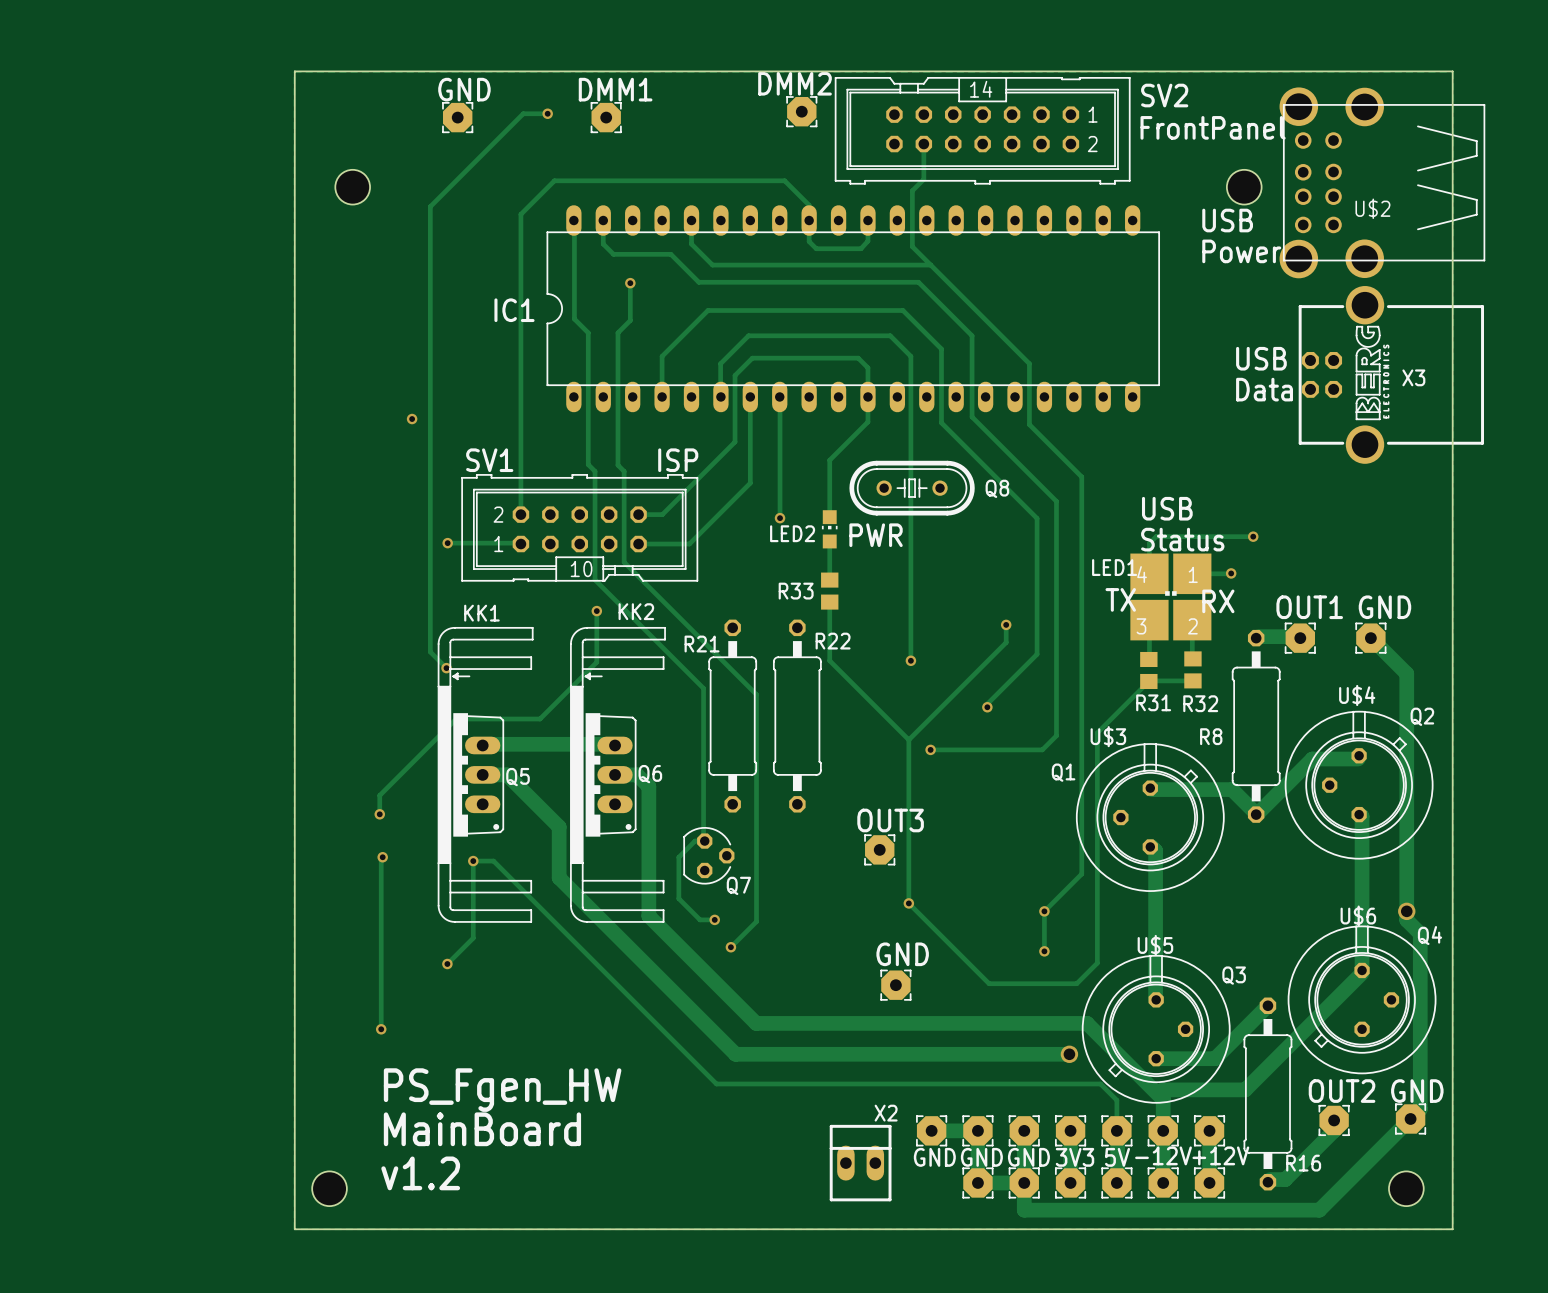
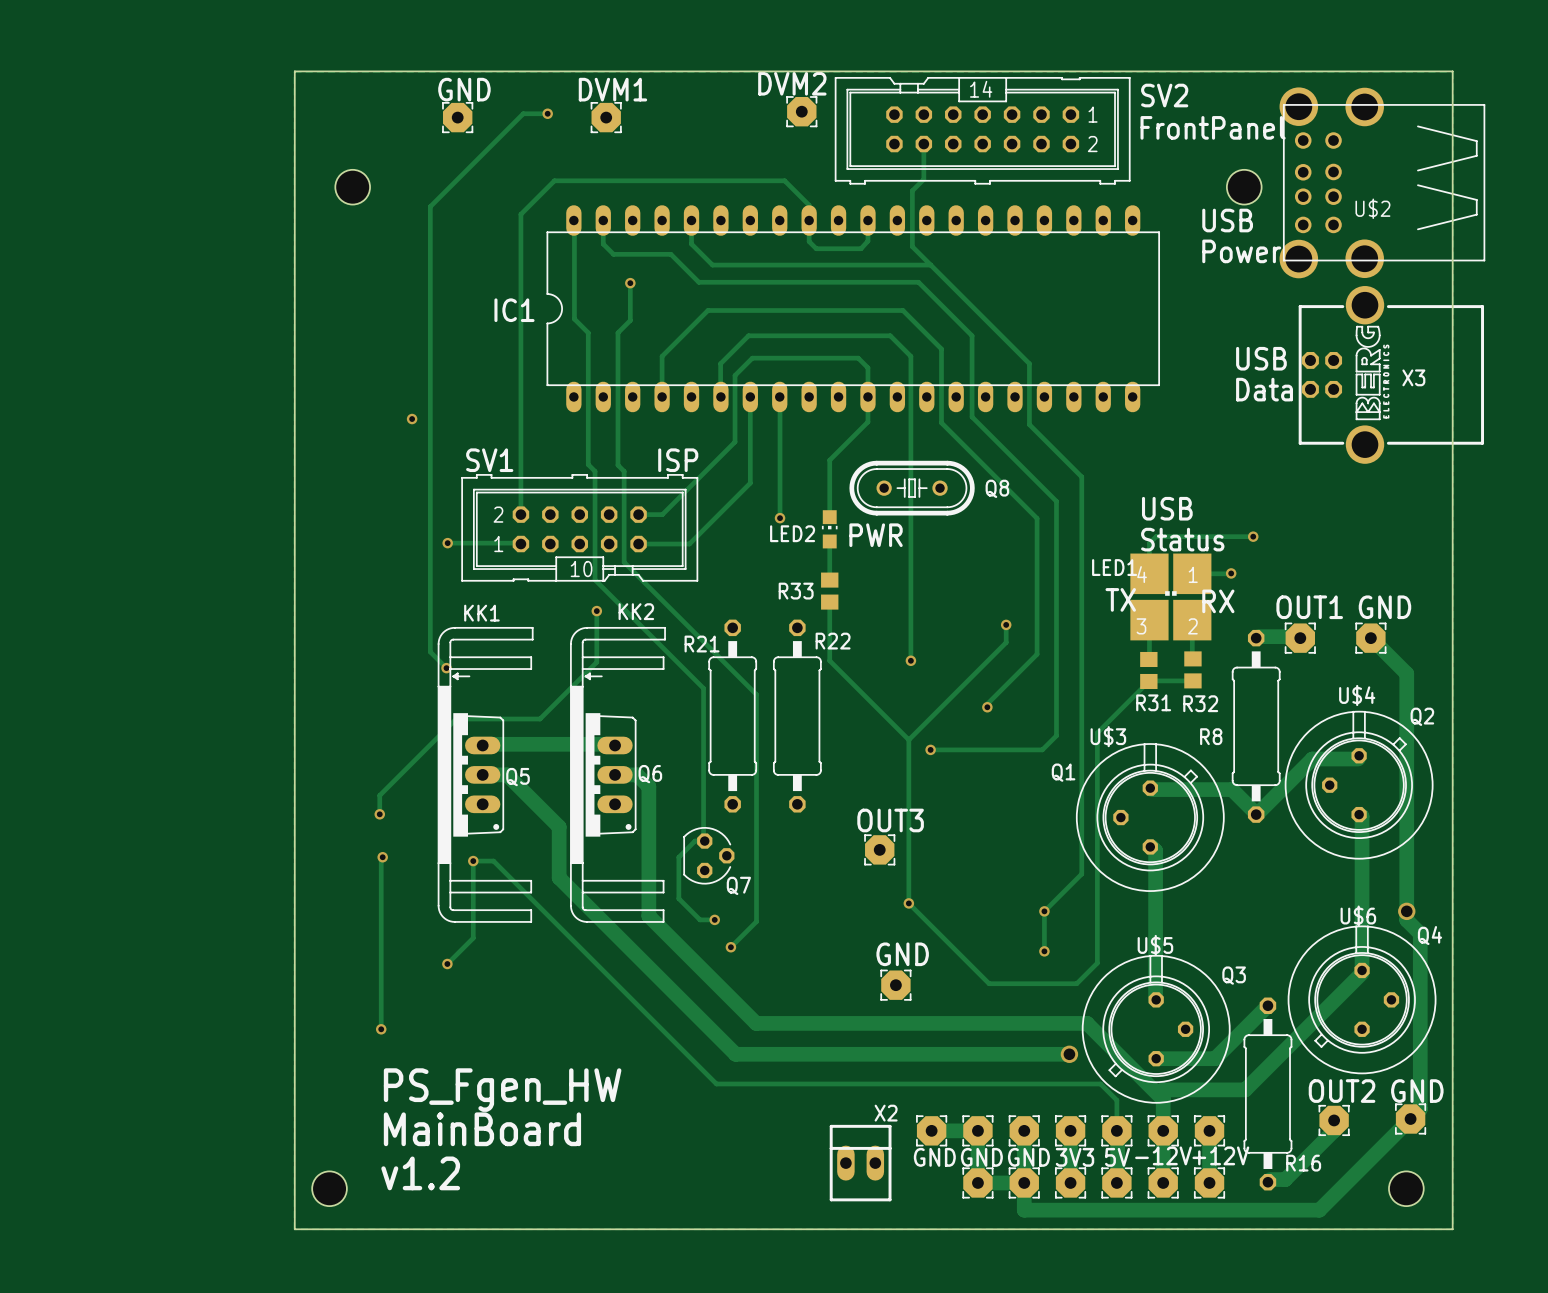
DMM2 name: DMM2 (795, 83) -> DVM2 (792, 83)
DMM1 name: DMM1 (615, 89) -> DVM1 (612, 89)

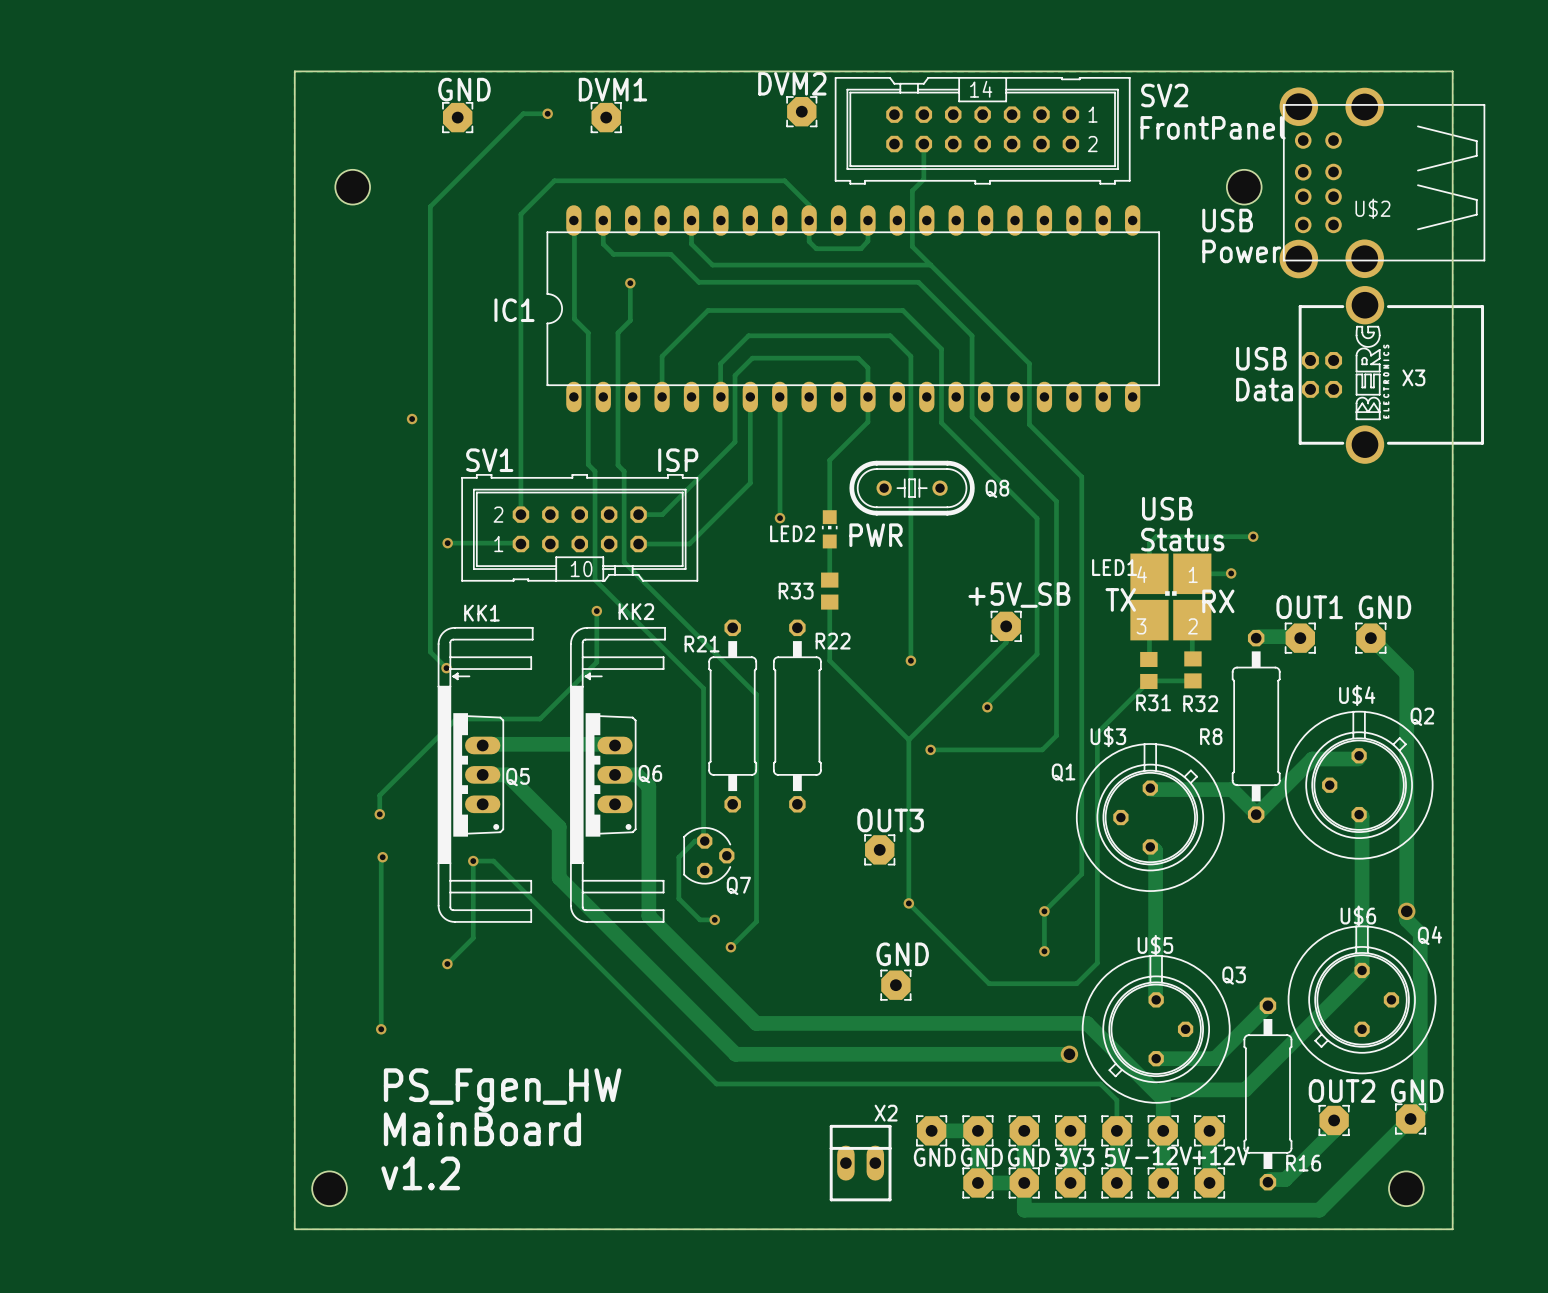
text: none -> +5V_SB (1019, 595)
via: (1006, 624) -> none
part: none -> (1006, 626)

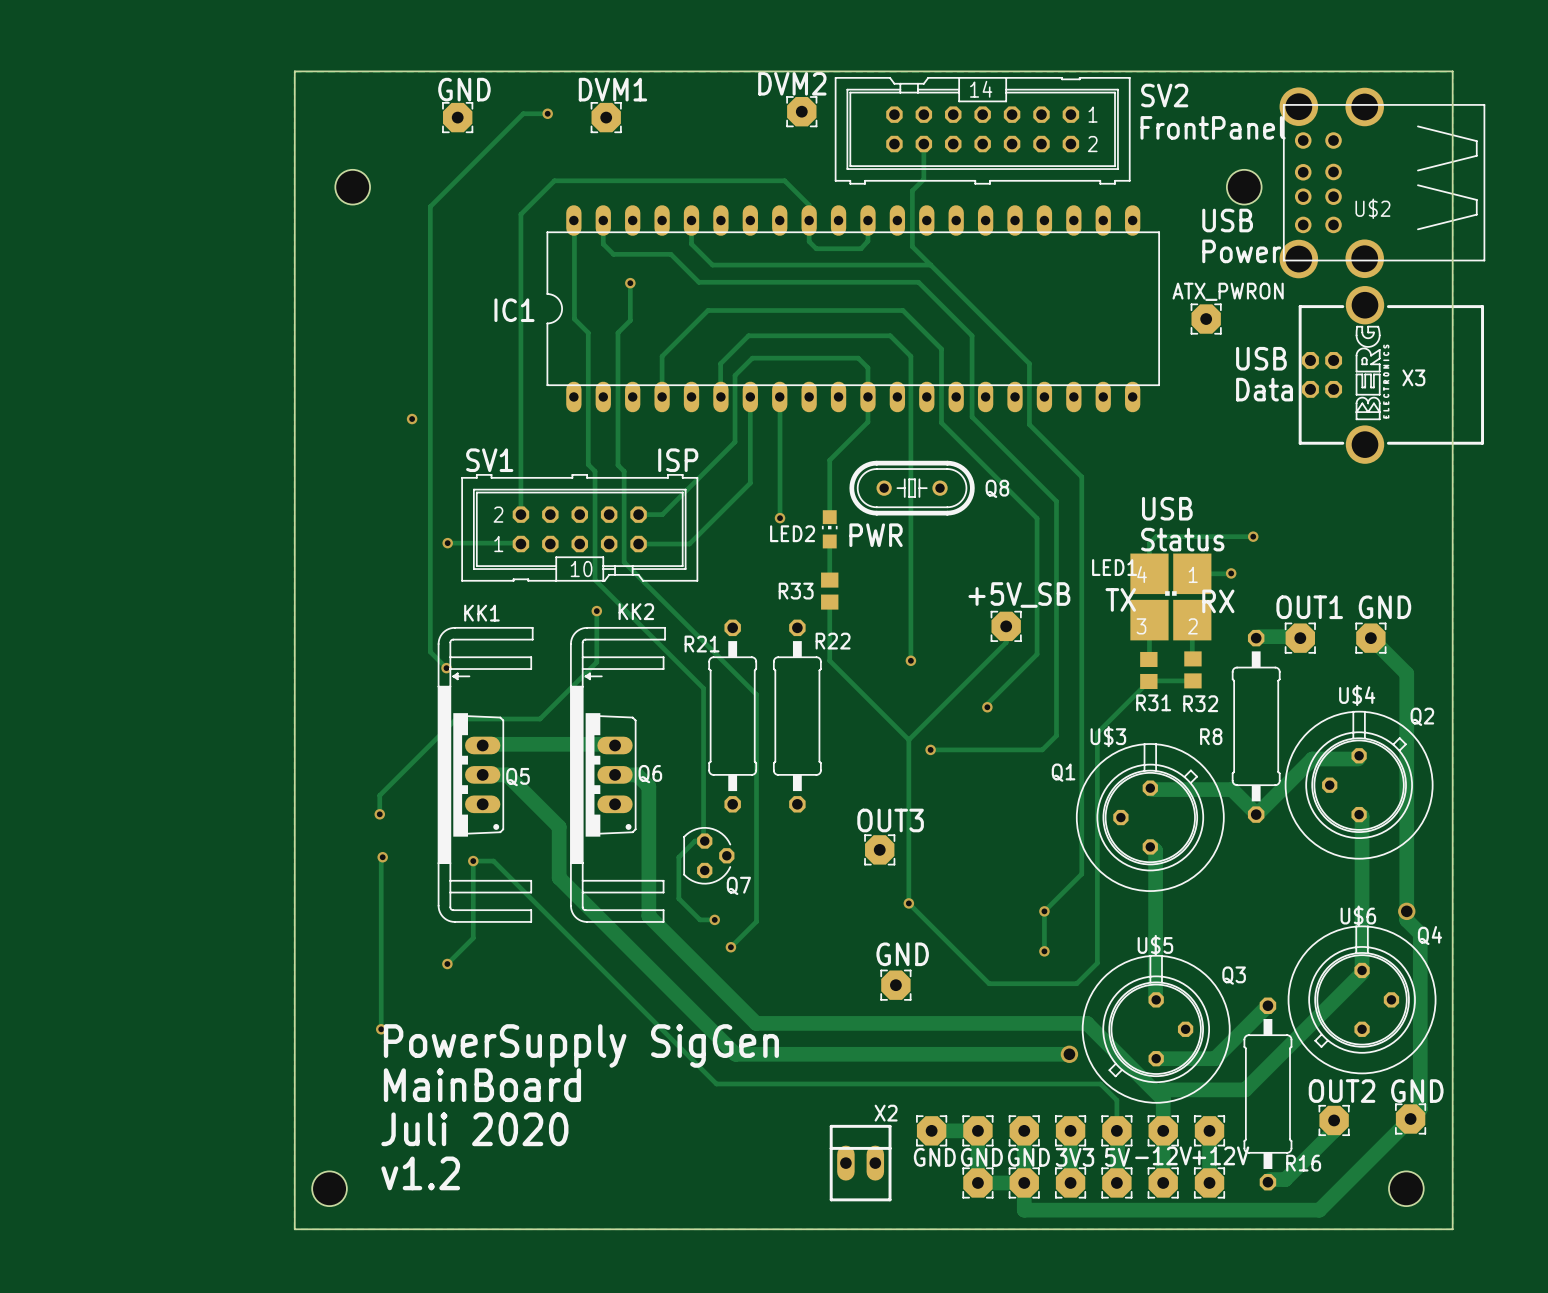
ATX_PWRON: none -> (1206, 319)
text: none -> PowerSupply SigGen (581, 1045)
text: PS_Fgen_HW (502, 1090) -> MainBoard (482, 1085)
text: MainBoard (482, 1129) -> Juli 2020 (474, 1129)

